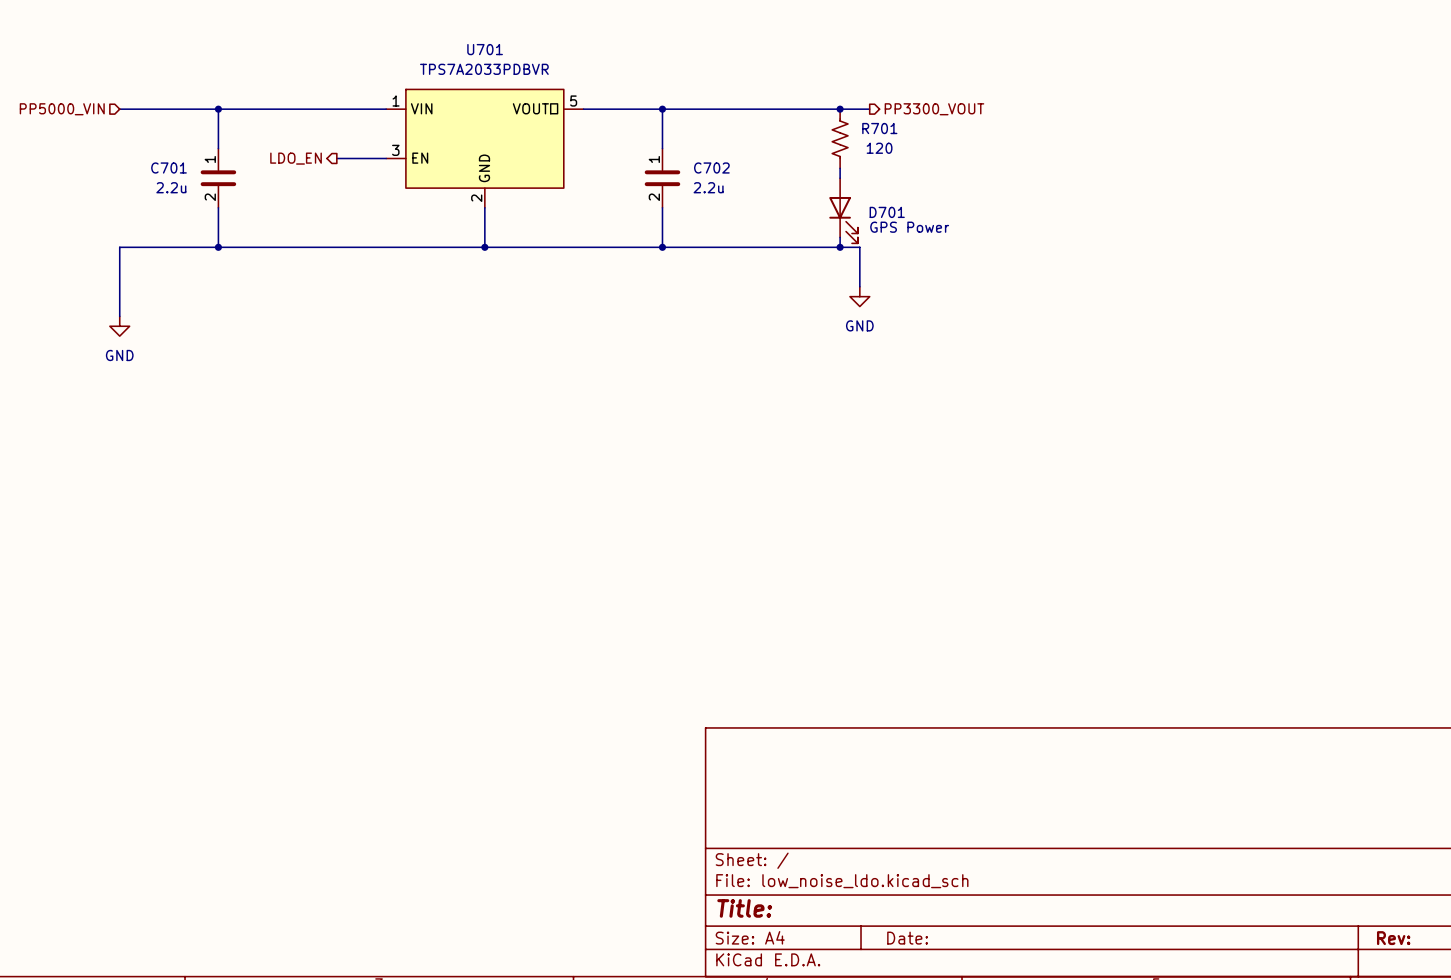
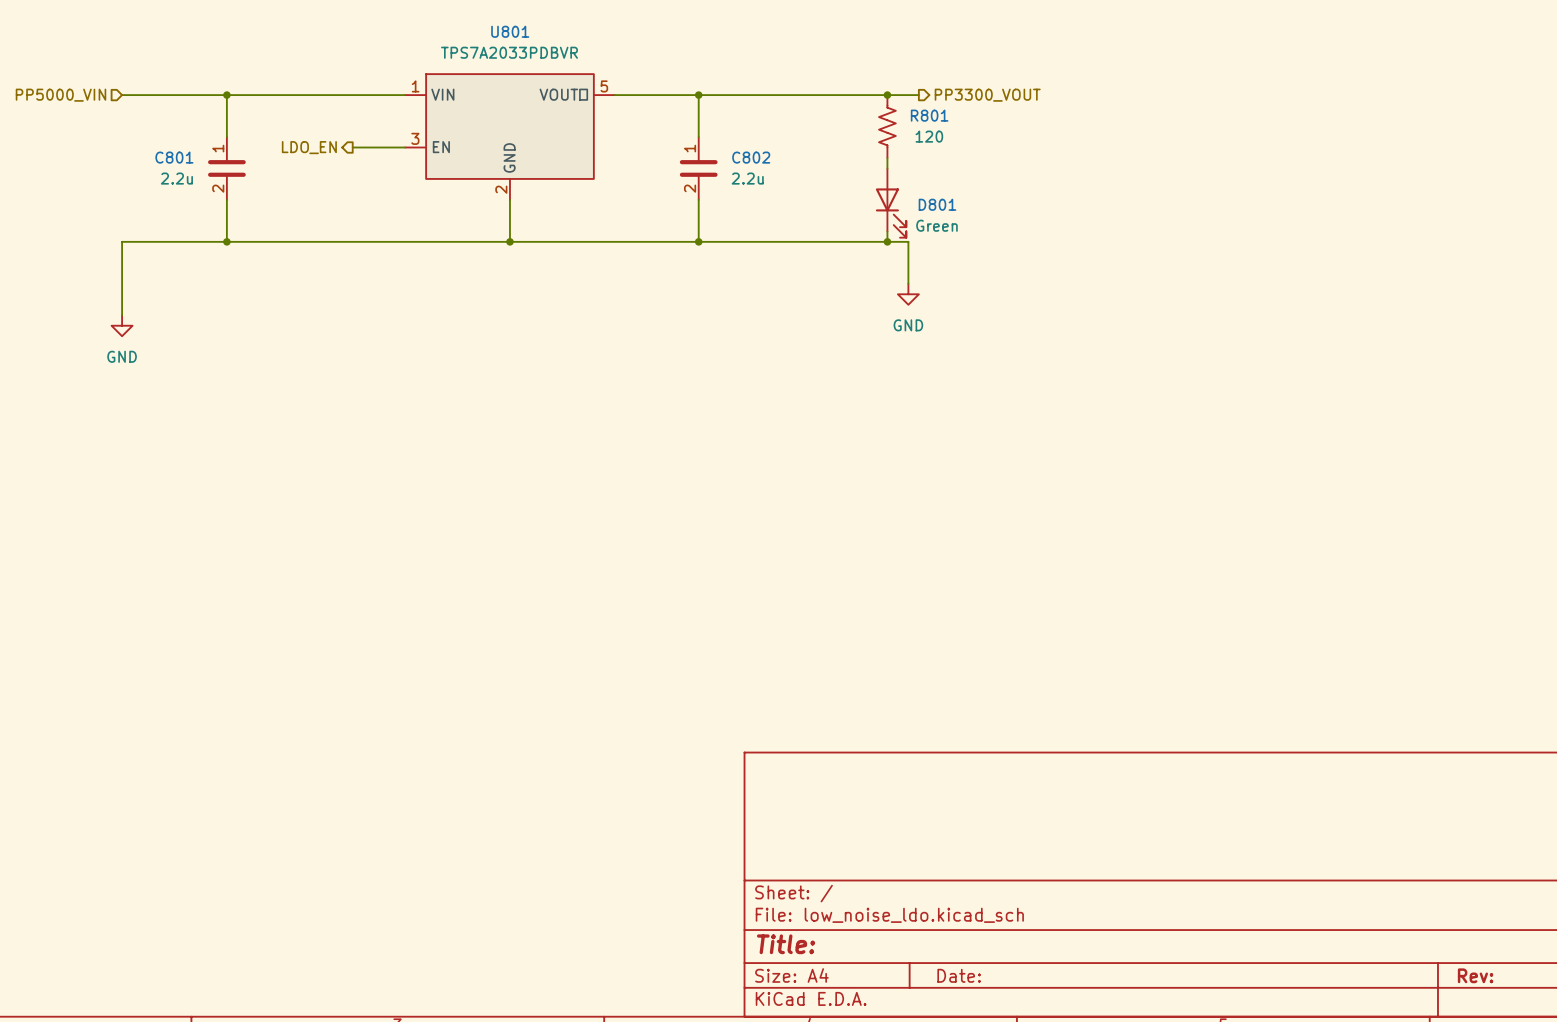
U701 name: U701 (485, 49) -> U801 (510, 31)
R701 name: R701 (879, 128) -> R801 (929, 115)
C701 name: C701 (169, 168) -> C801 (174, 157)
C702 name: C702 (711, 168) -> C802 (751, 157)
D701 name: D701 (887, 212) -> D801 (937, 204)
D701 value: GPS Power (909, 227) -> Green (936, 225)

